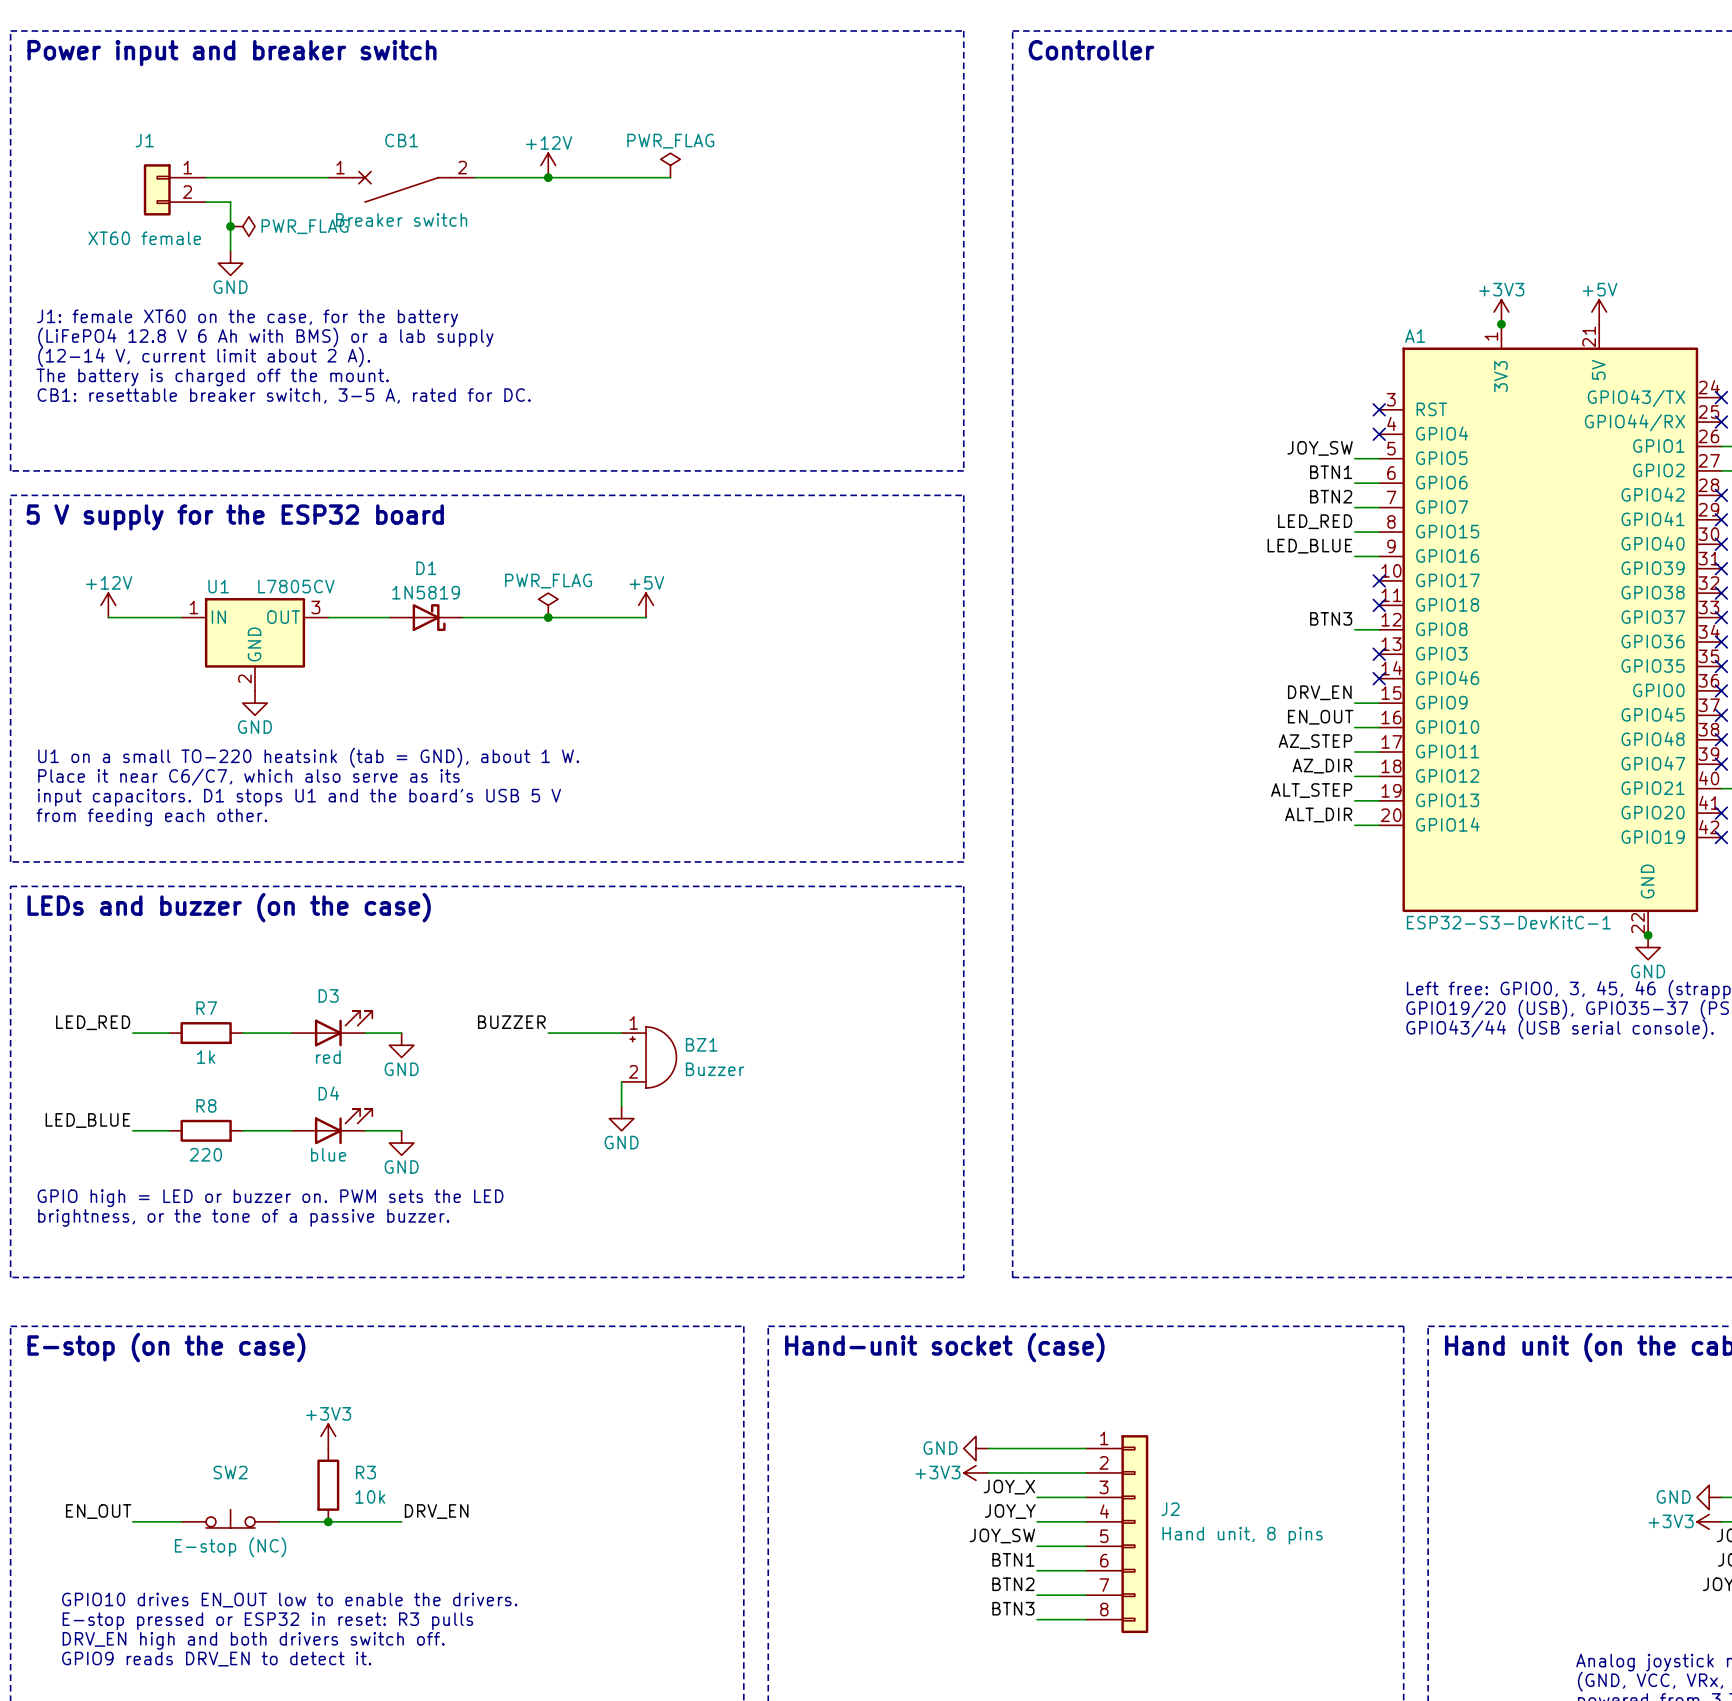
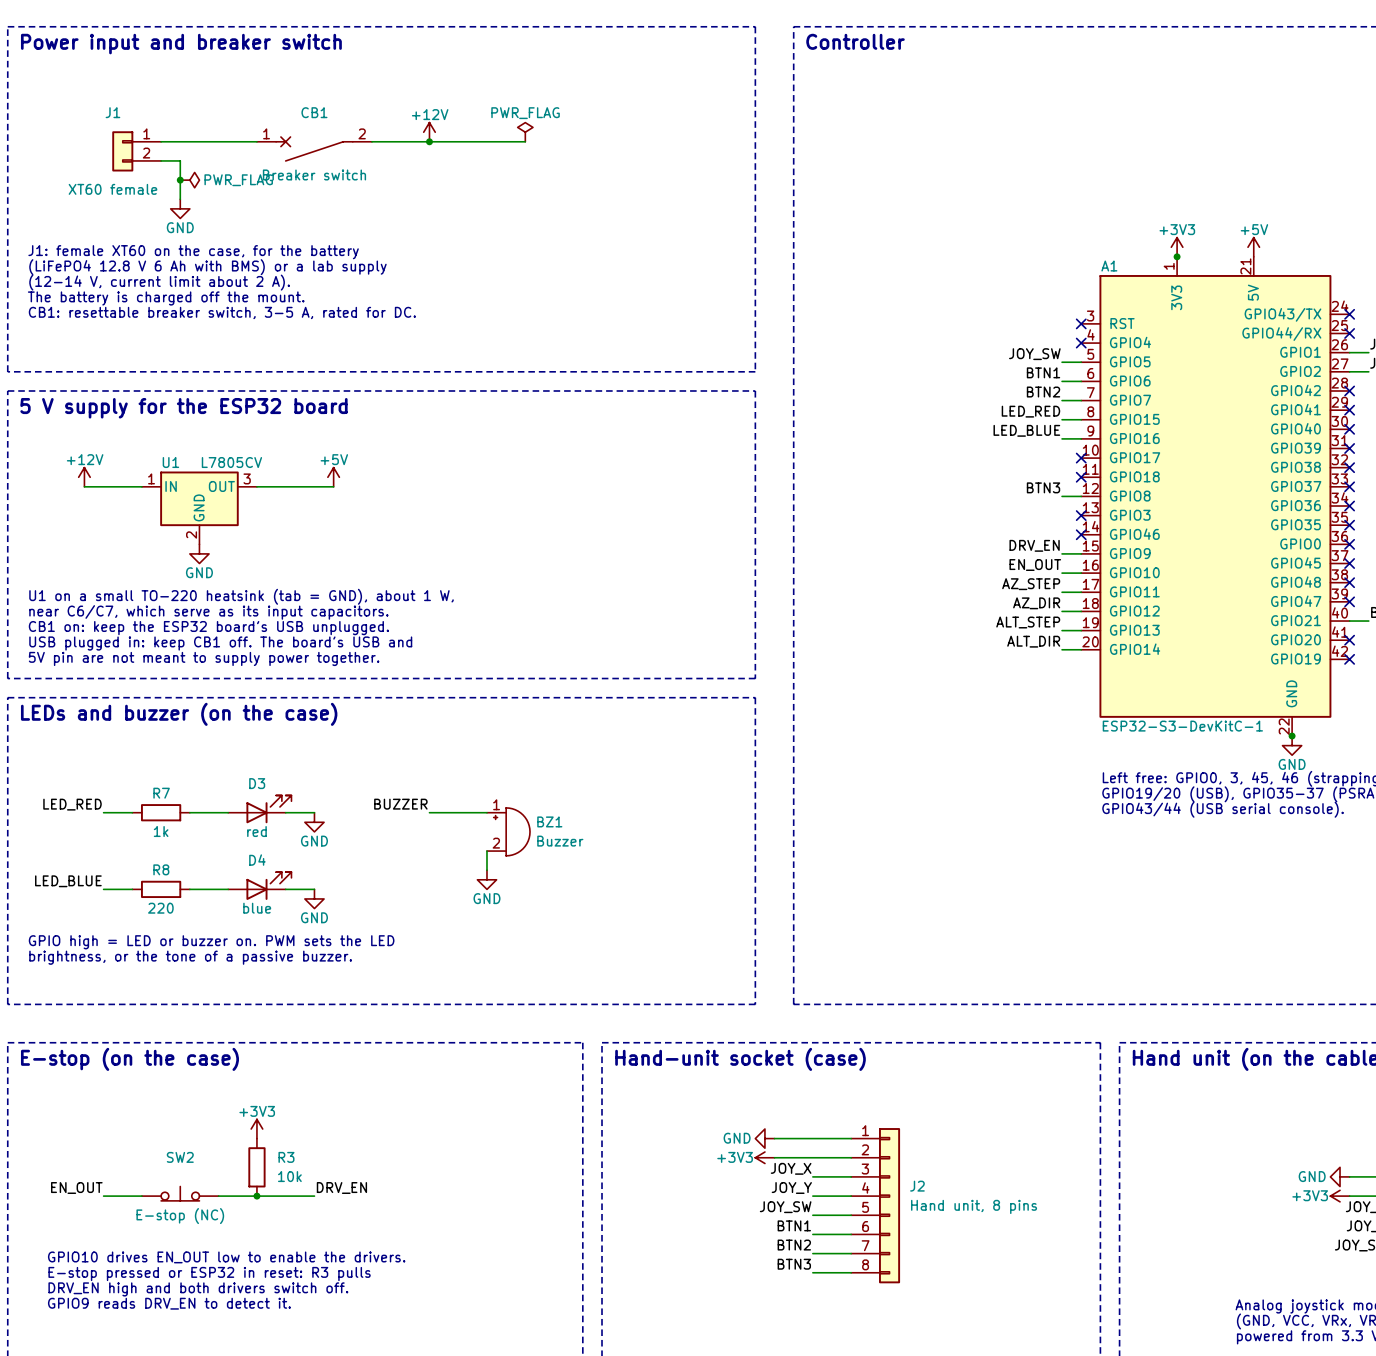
power symbol: PWR_FLAG (548, 605) -> none
power symbol position: +5V (646, 605) -> +5V (333, 477)
D1: 1N5819 (426, 617) -> none
wire: (462, 617) (646, 617) -> none
junction: (548, 617) -> none
text: U1 on a small TO-220 heatsink (tab = GND), about 1 W. (308, 757) -> U1 on a small TO-220 heatsink (tab = GND), about 1 W, (241, 596)
text: Place it near C6/C7, which also serve as its (248, 777) -> near C6/C7, which serve as its input capacitors. (208, 612)
text: input capacitors. D1 stops U1 and the board's USB 5 V (299, 797) -> CB1 on: keep the ESP32 board's USB unplugged. (208, 628)
text: from feeding each other. (151, 817) -> USB plugged in: keep CB1 off. The board's USB and (220, 643)
text: none -> 5V pin are not meant to supply power together. (204, 658)

